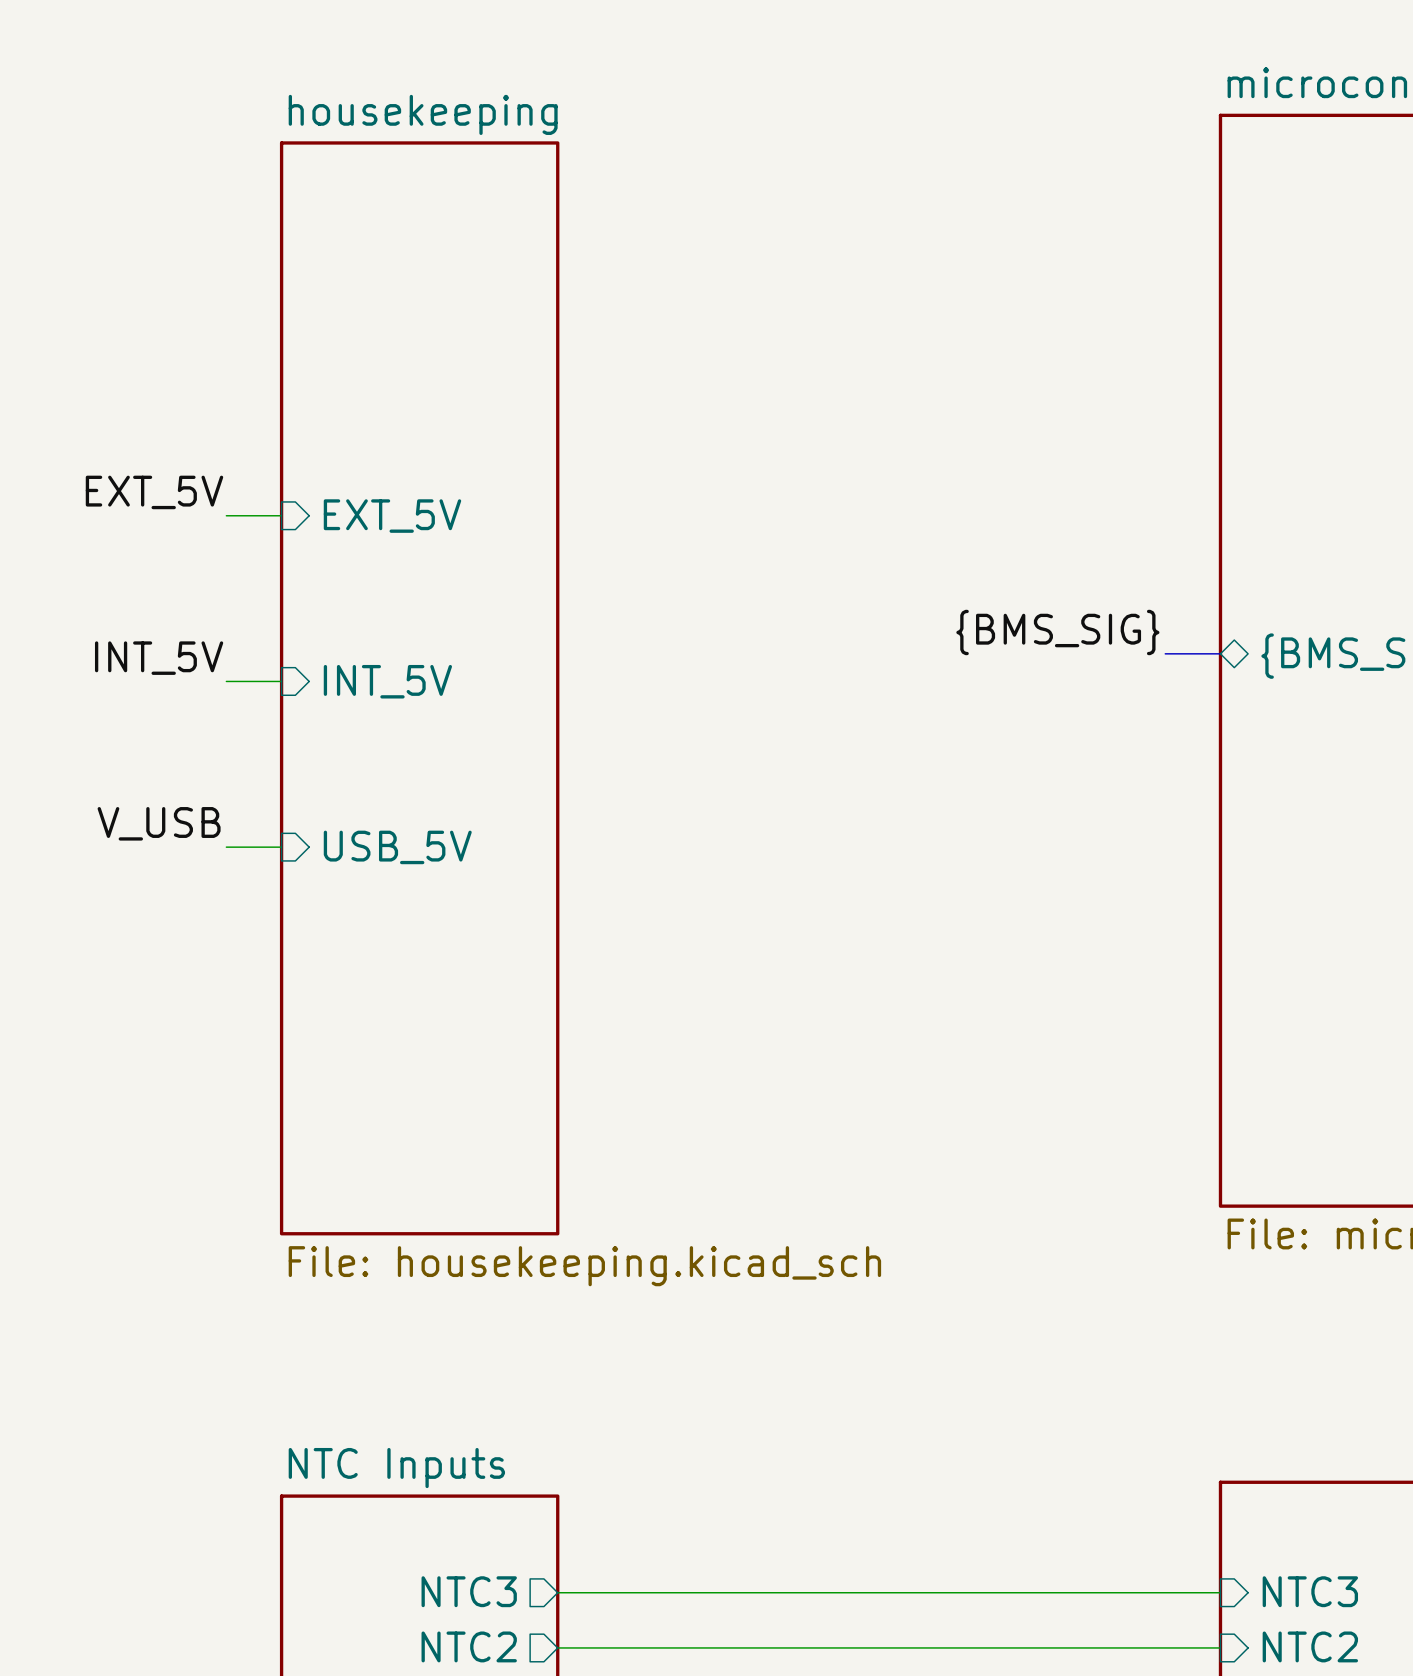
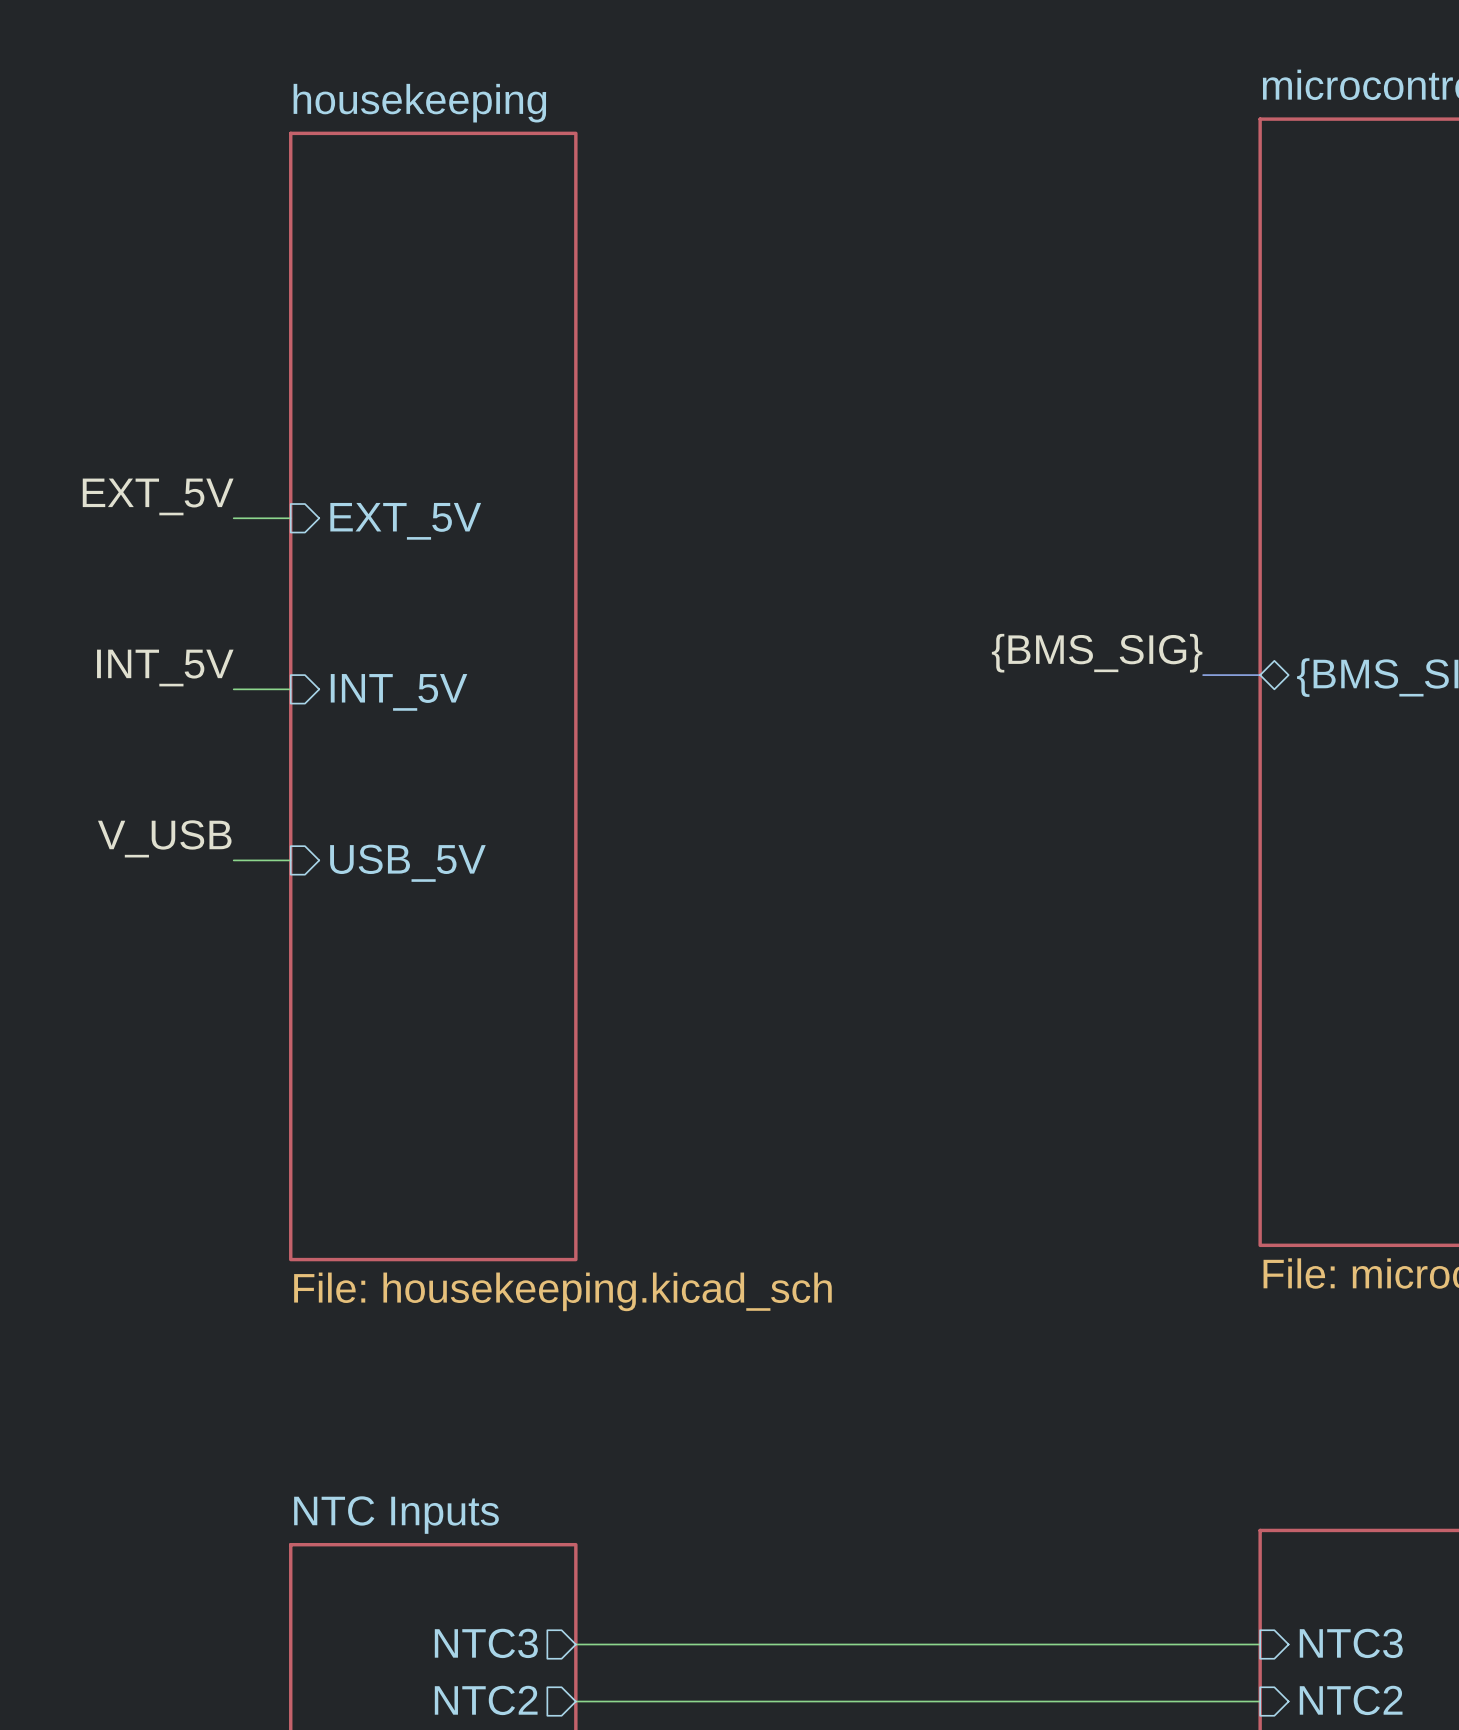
label position: EXT_5V (154, 492) -> EXT_5V (158, 496)
wire: (226, 515) (281, 515) -> (233, 518) (290, 518)
sheet pin position: EXT_5V (392, 516) -> EXT_5V (405, 521)
label position: INT_5V (159, 658) -> INT_5V (165, 668)
wire: (226, 681) (281, 681) -> (233, 689) (290, 689)
sheet pin position: INT_5V (387, 681) -> INT_5V (399, 692)
sheet housekeeping position: (419, 688) -> (433, 696)
label position: V_USB (159, 823) -> V_USB (164, 838)
wire: (226, 847) (281, 847) -> (233, 860) (290, 860)
sheet pin position: USB_5V (397, 847) -> USB_5V (407, 863)

